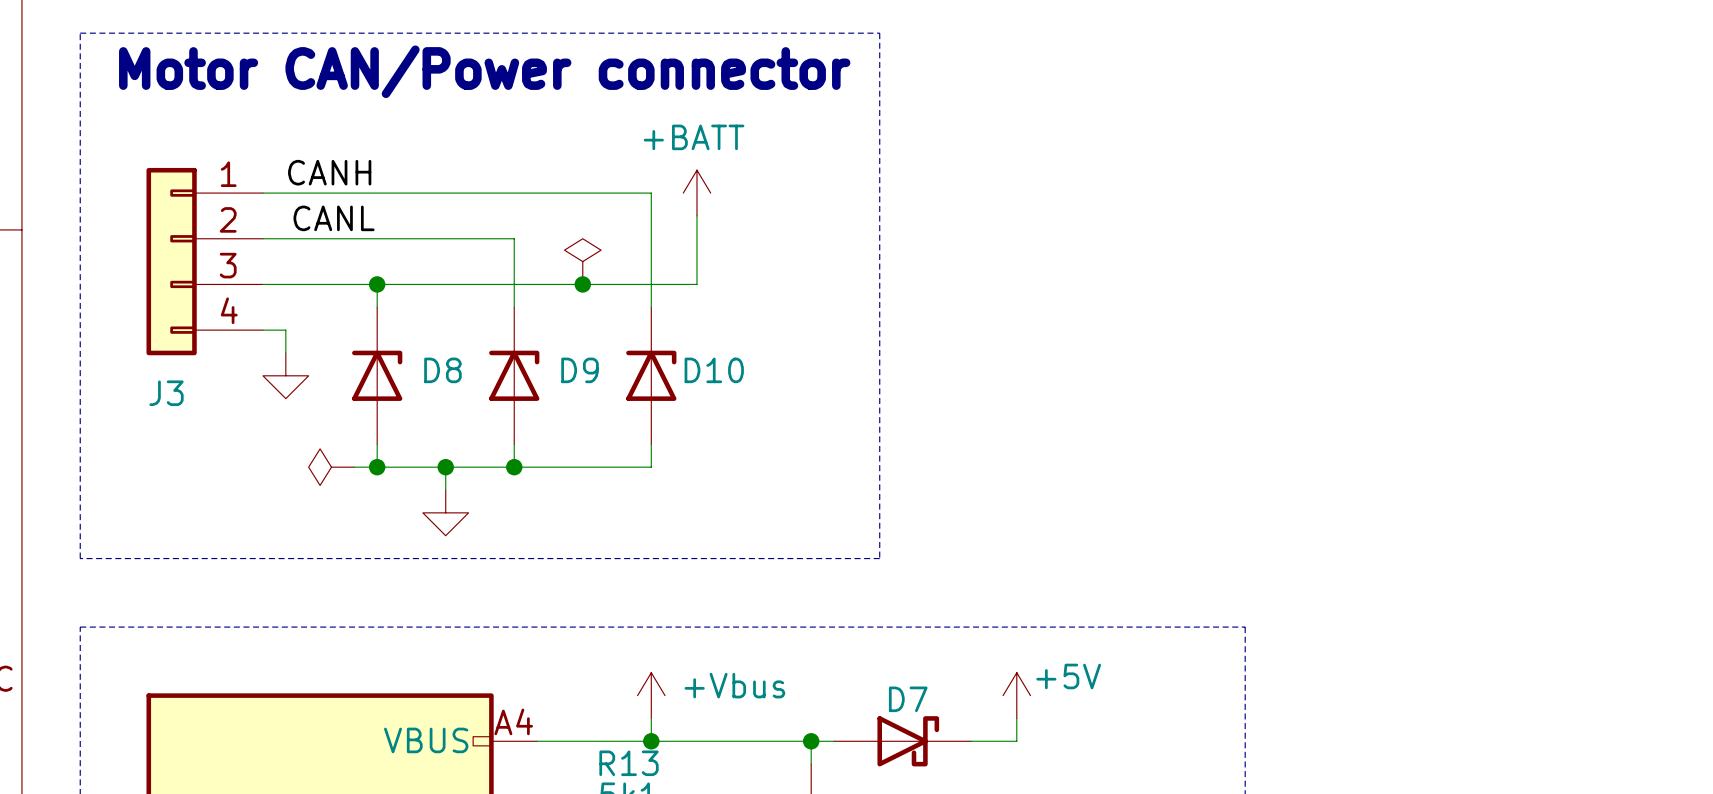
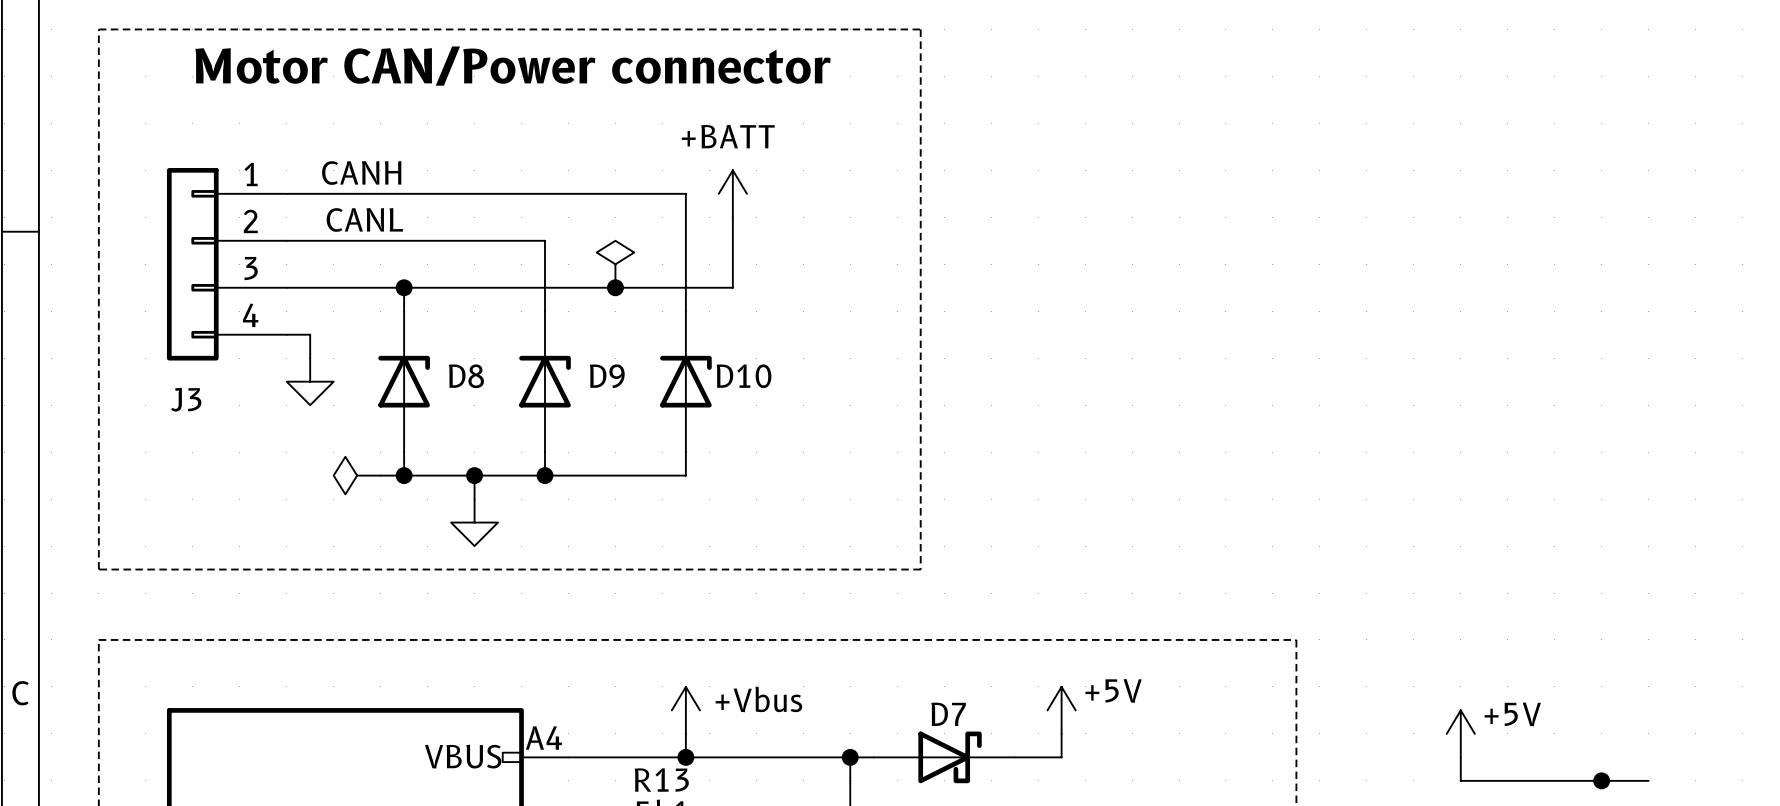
power symbol: none -> +5V (1460, 733)
wire: none -> (1460, 757) (1460, 780) (1648, 780)
junction: none -> (1601, 780)

